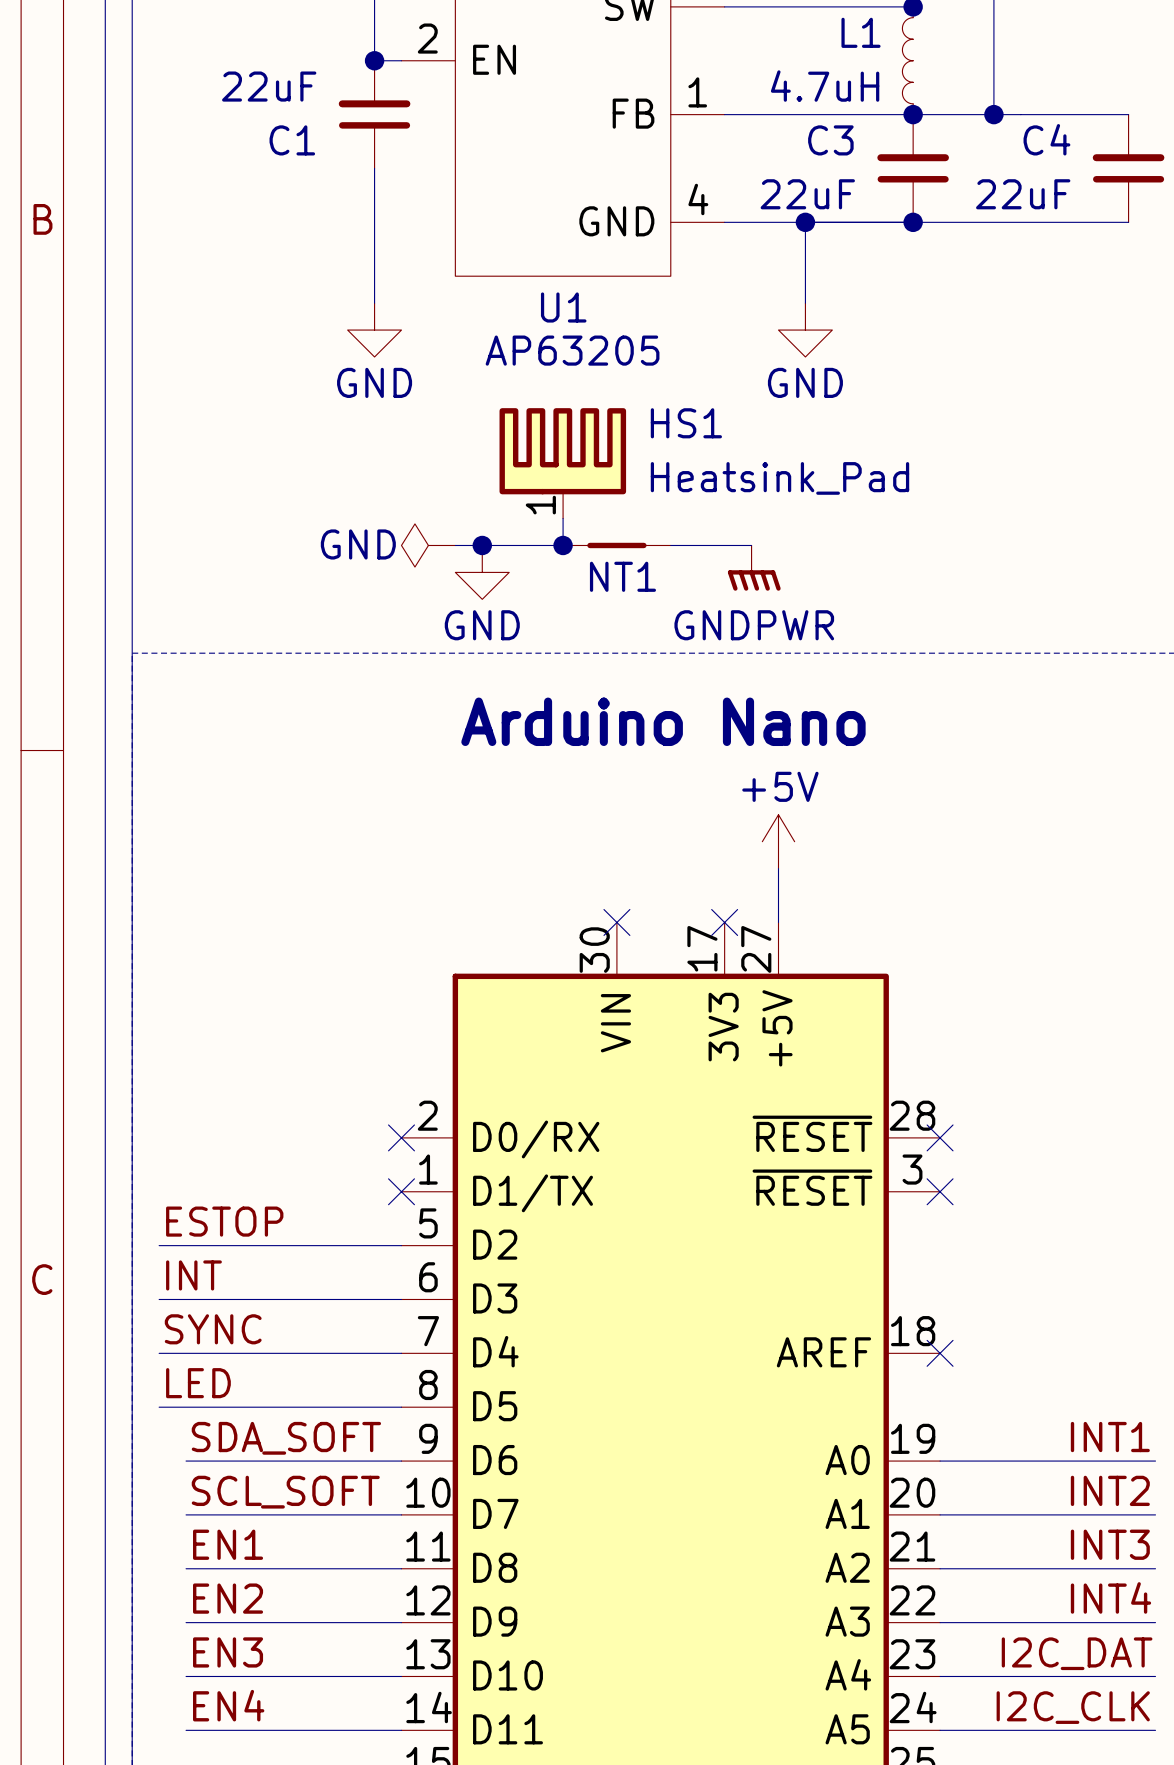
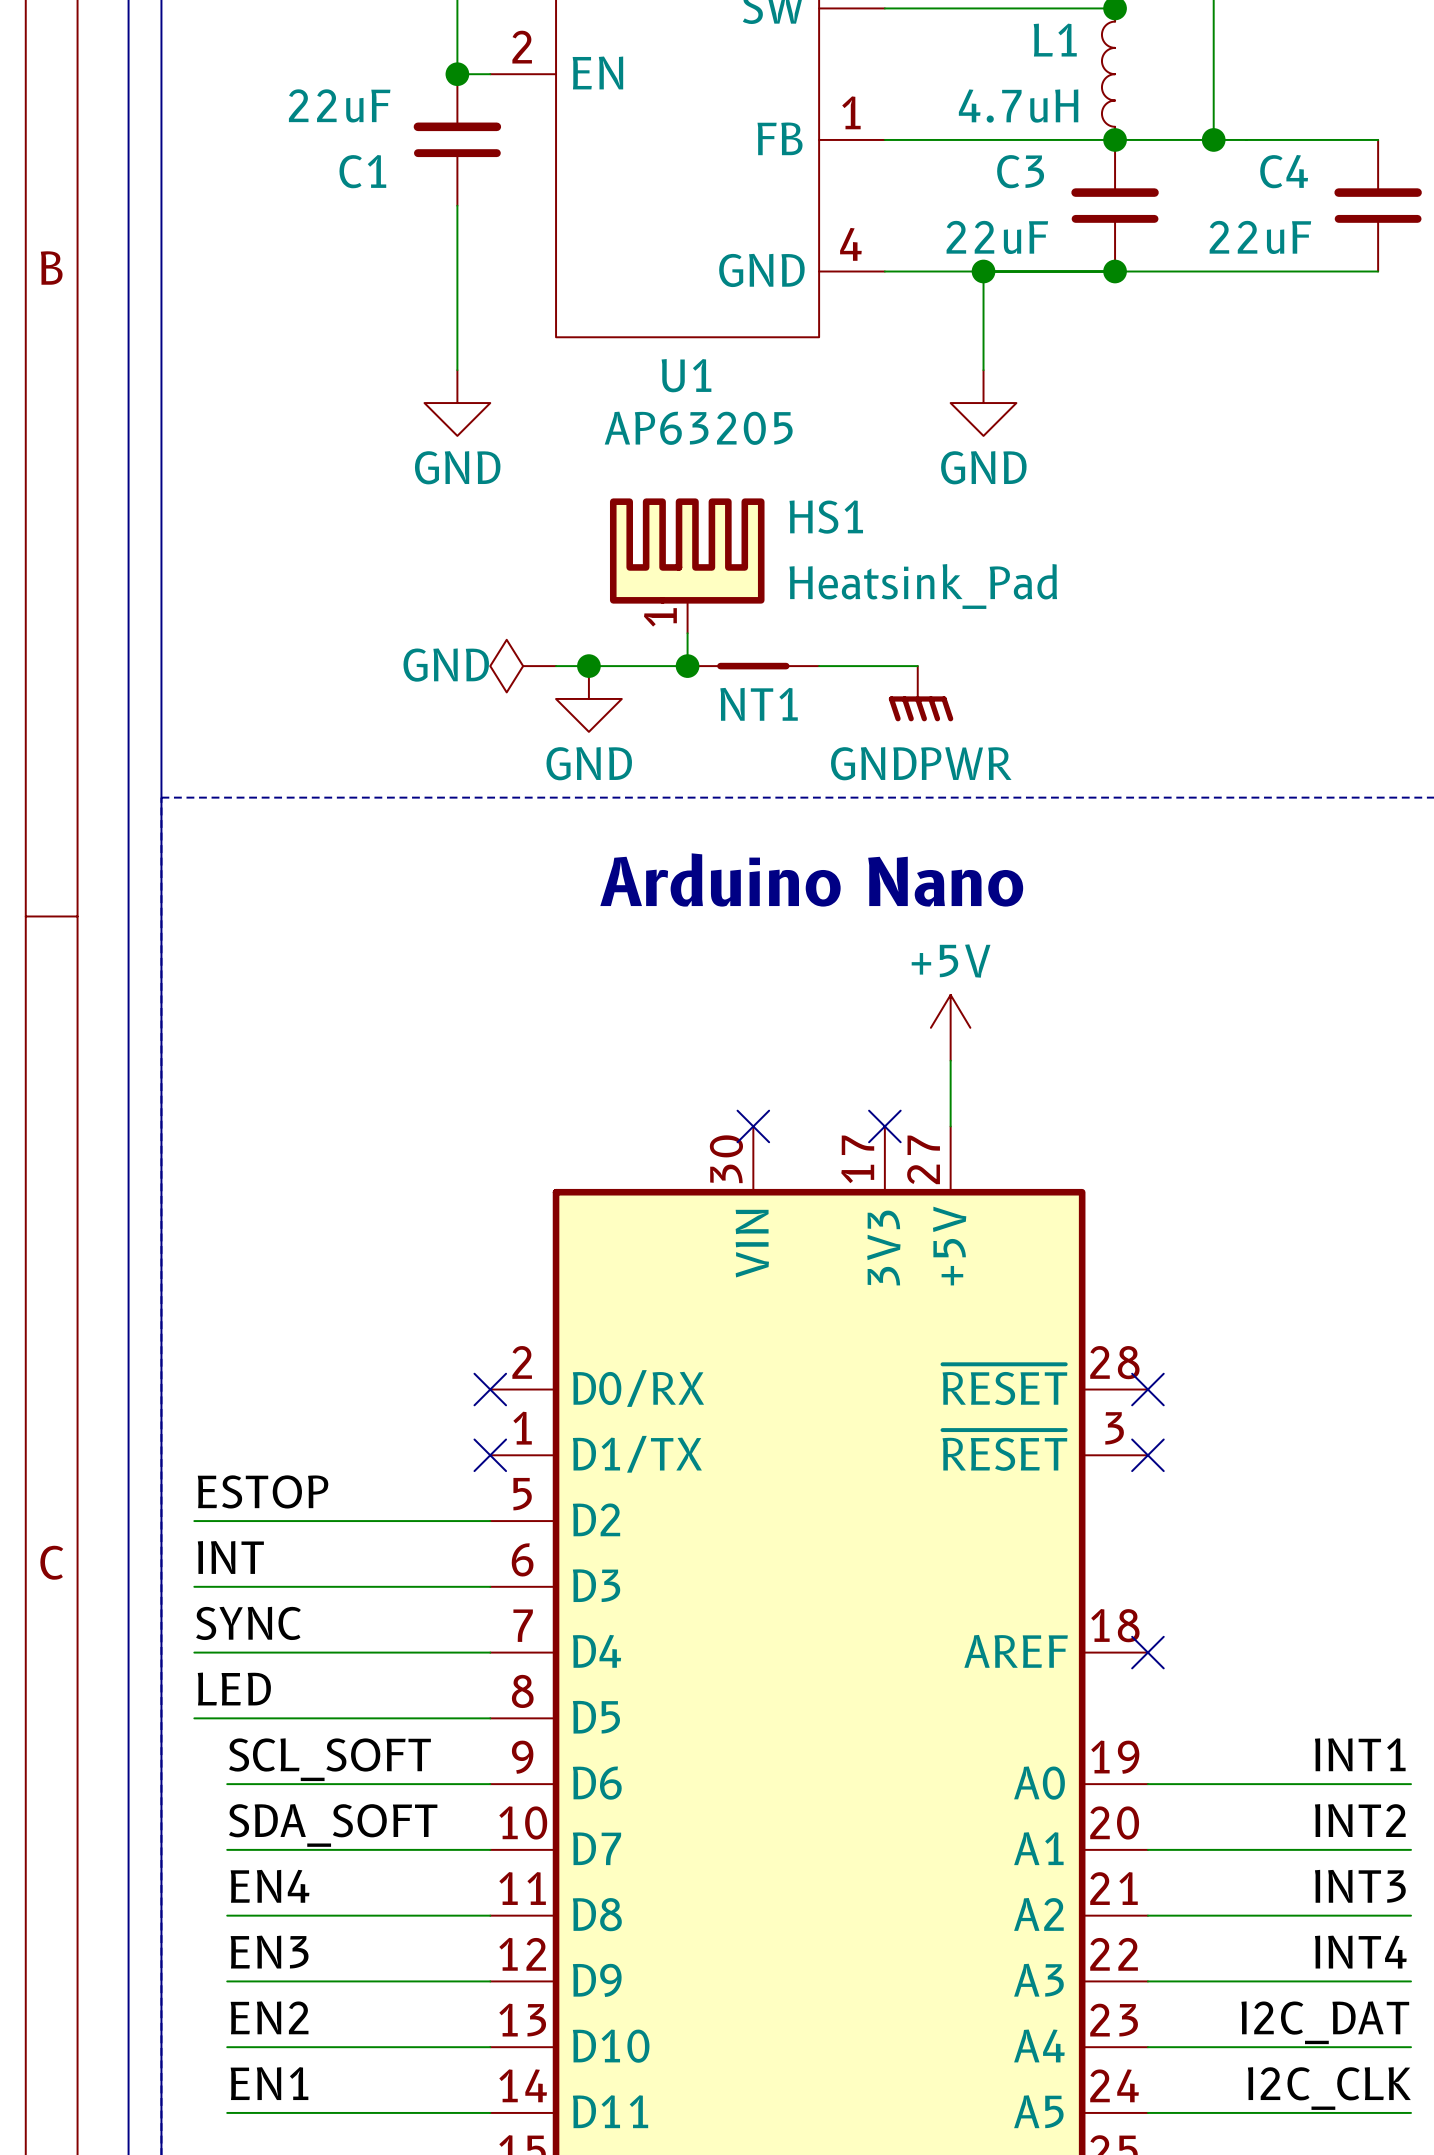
label: SDA_SOFT (286, 1438) -> SCL_SOFT (329, 1759)
label: SCL_SOFT (285, 1492) -> SDA_SOFT (333, 1825)
label: EN1 (228, 1544) -> EN4 (270, 1886)
label: EN2 (228, 1598) -> EN3 (269, 1952)
label: EN3 (228, 1652) -> EN2 (269, 2017)
label: EN4 (228, 1705) -> EN1 (269, 2083)

